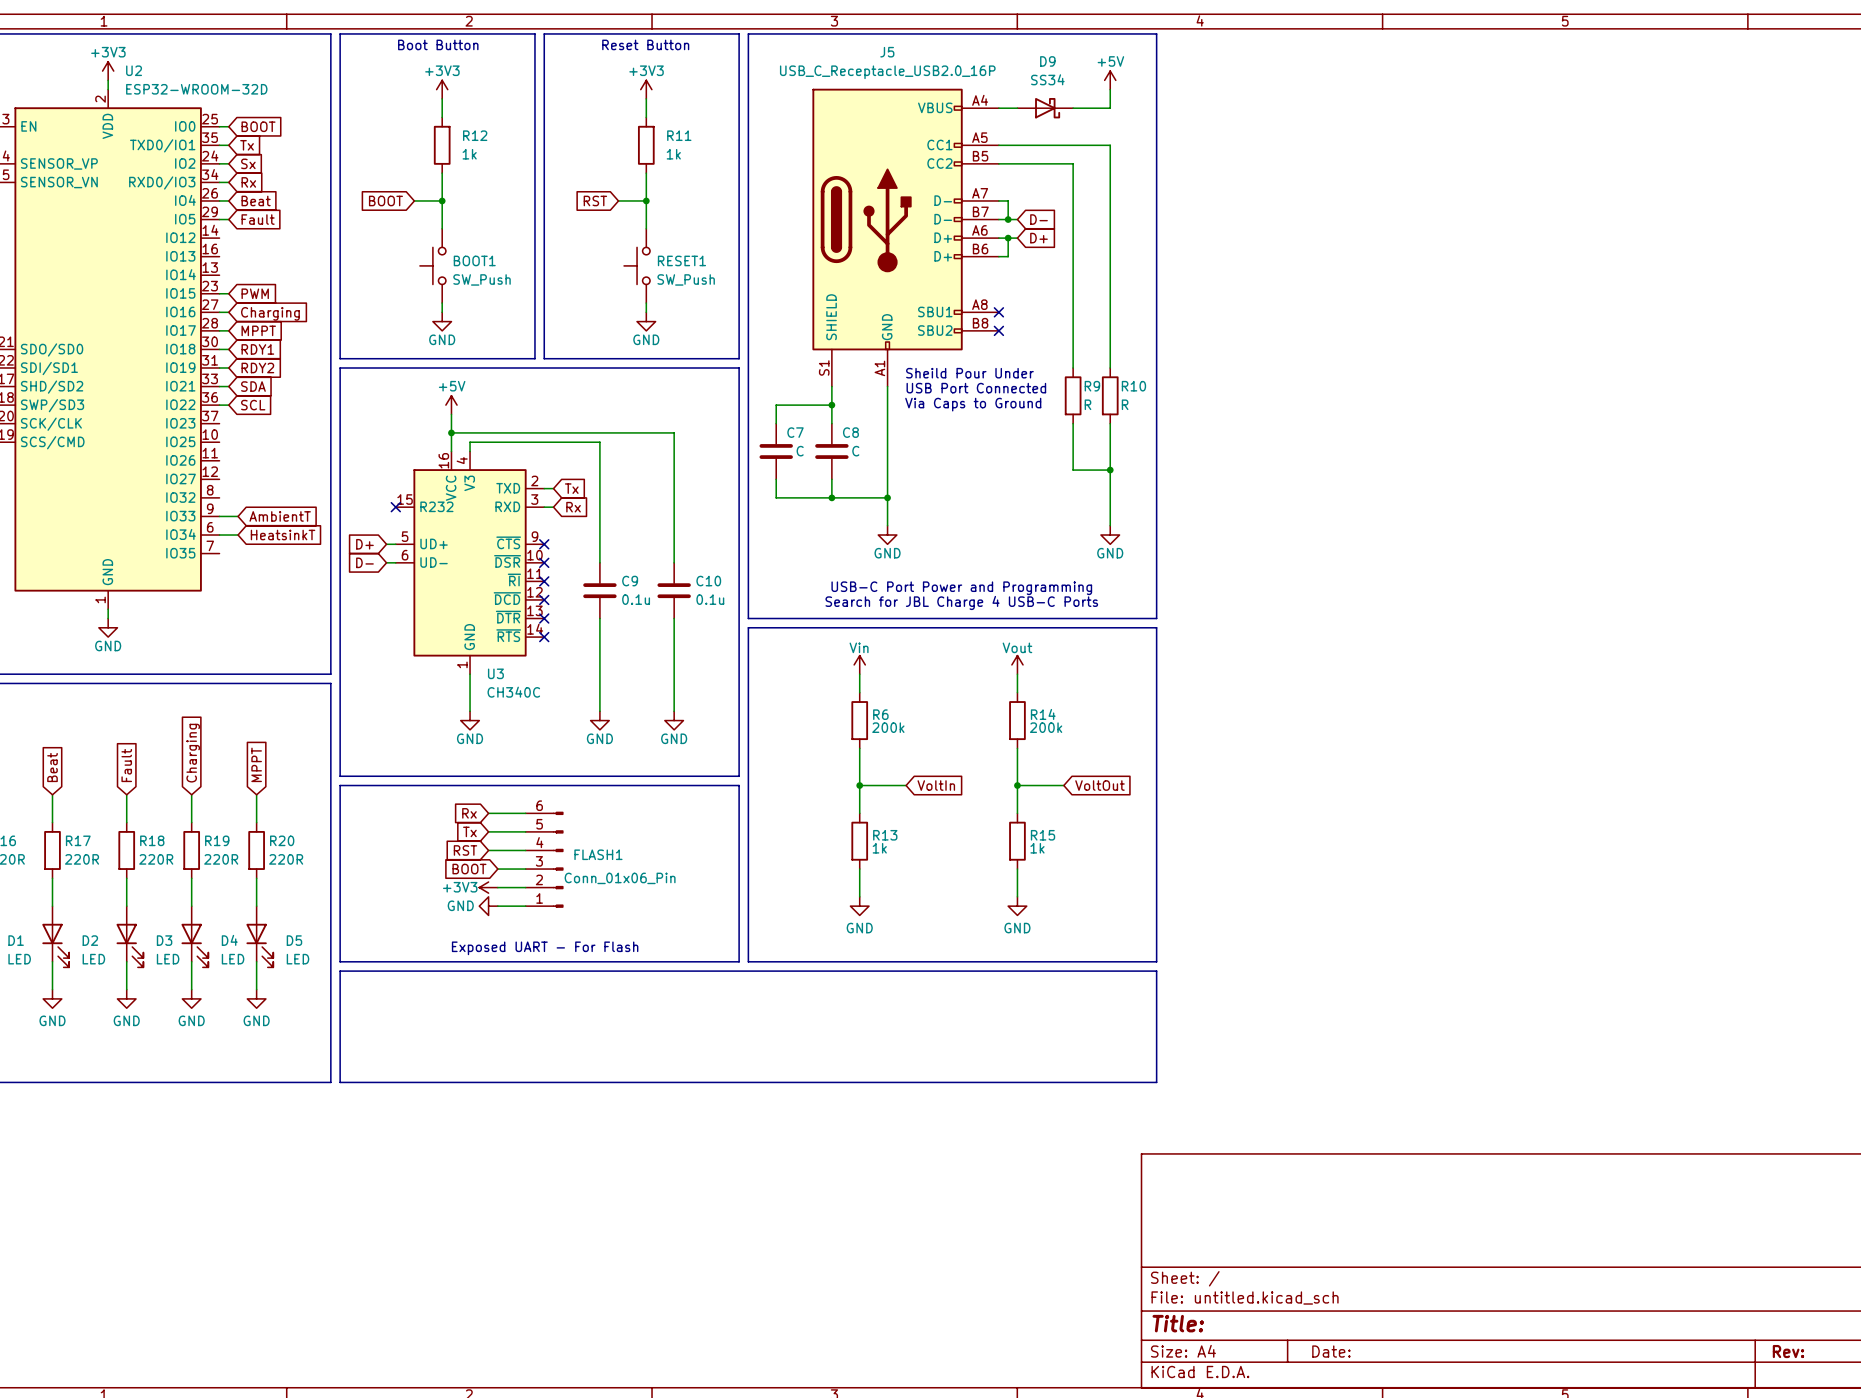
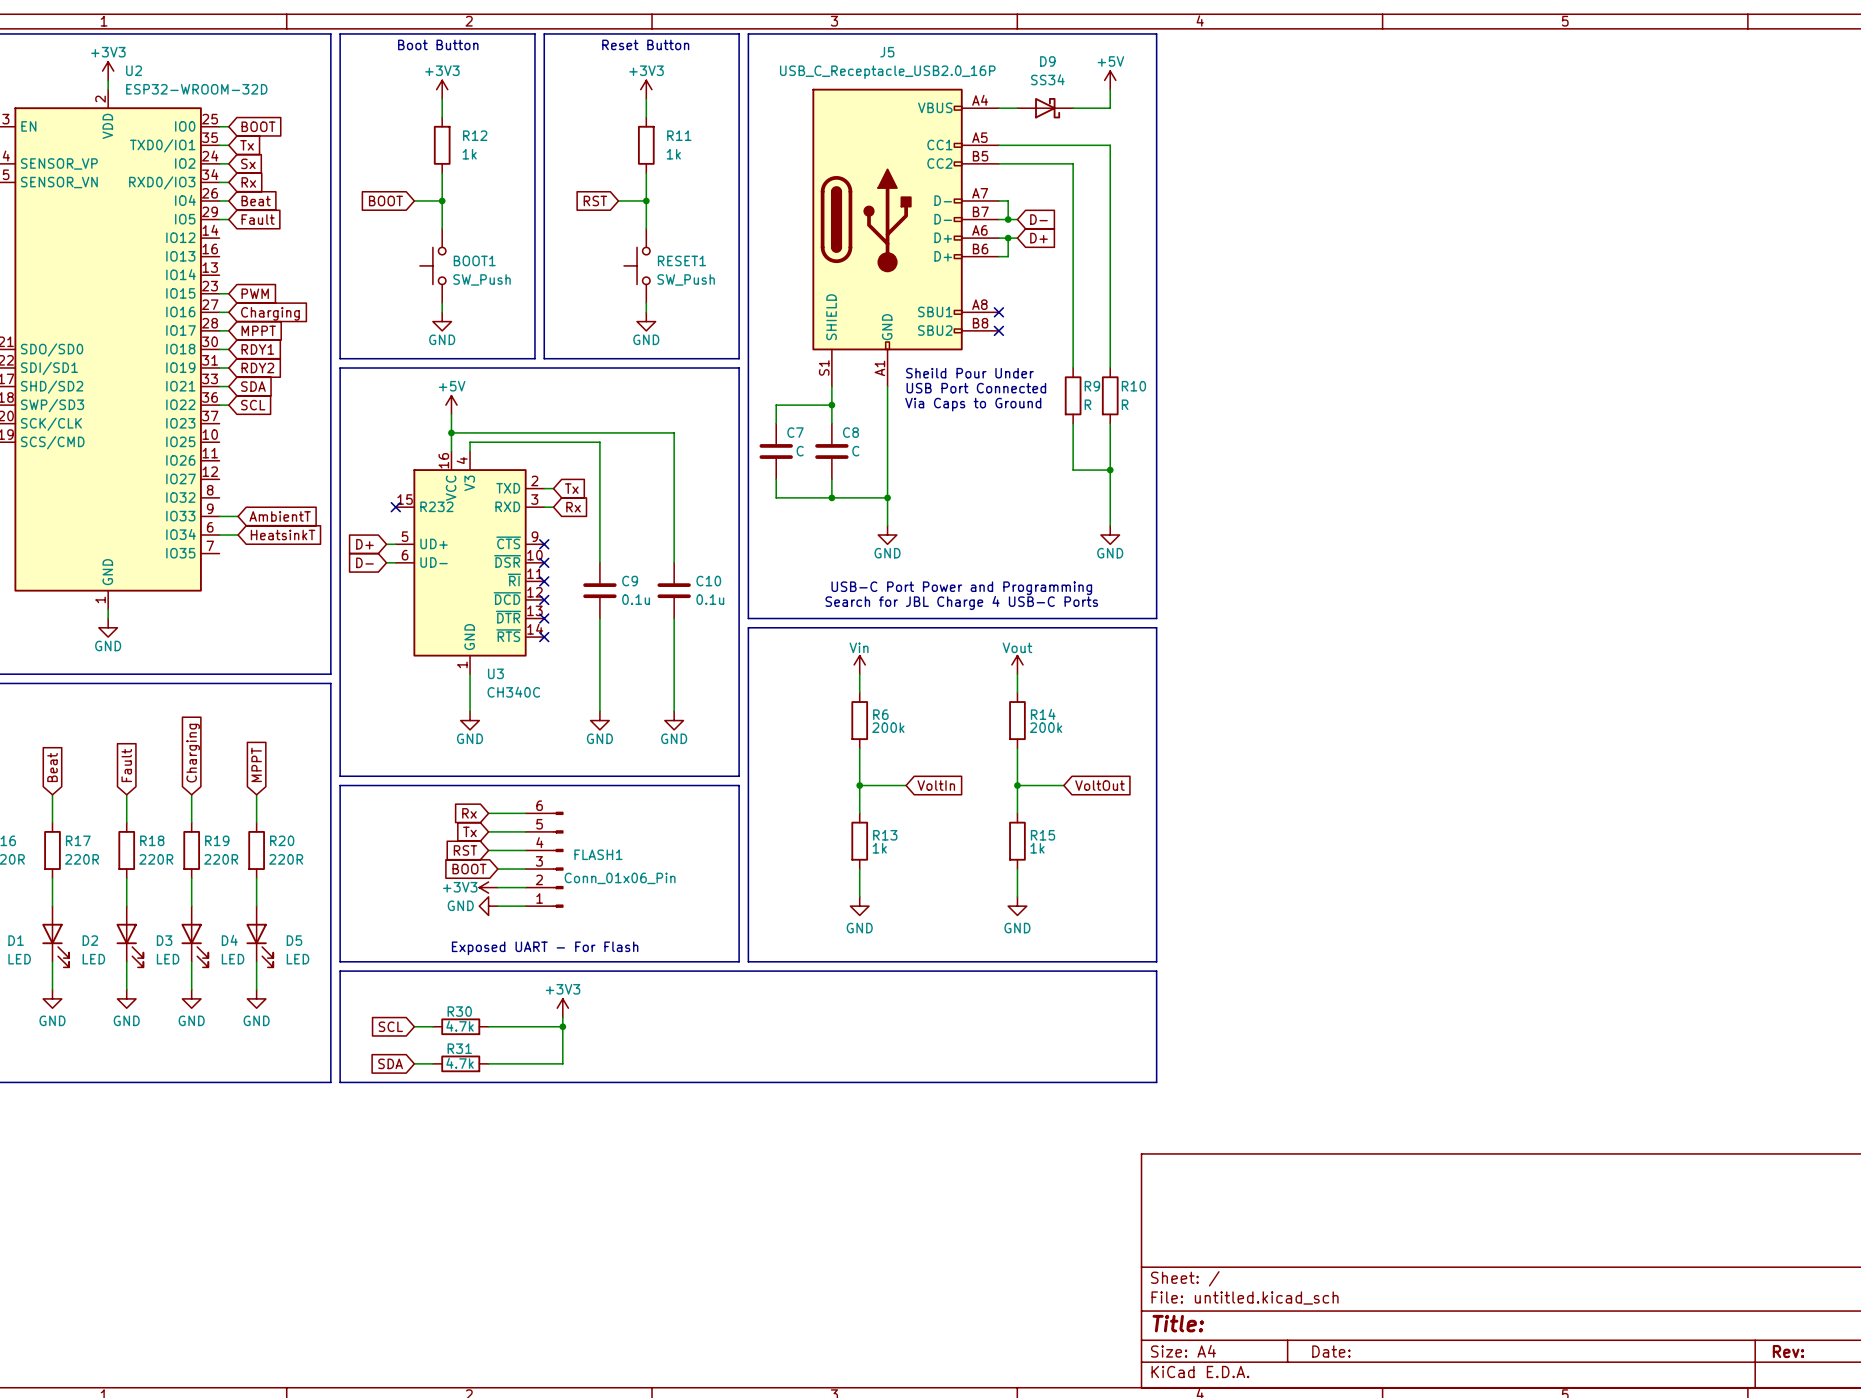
power symbol: none -> +3V3 (562, 1008)
wire: none -> (562, 1017) (562, 1063) (488, 1063)
global label: none -> SCL (390, 1026)
wire: none -> (414, 1026) (432, 1026)
R30: none -> 4.7k (460, 1026)
wire: none -> (488, 1026) (562, 1026)
junction: none -> (562, 1026)
global label: none -> SDA (390, 1063)
wire: none -> (414, 1063) (432, 1063)
R31: none -> 4.7k (460, 1063)

